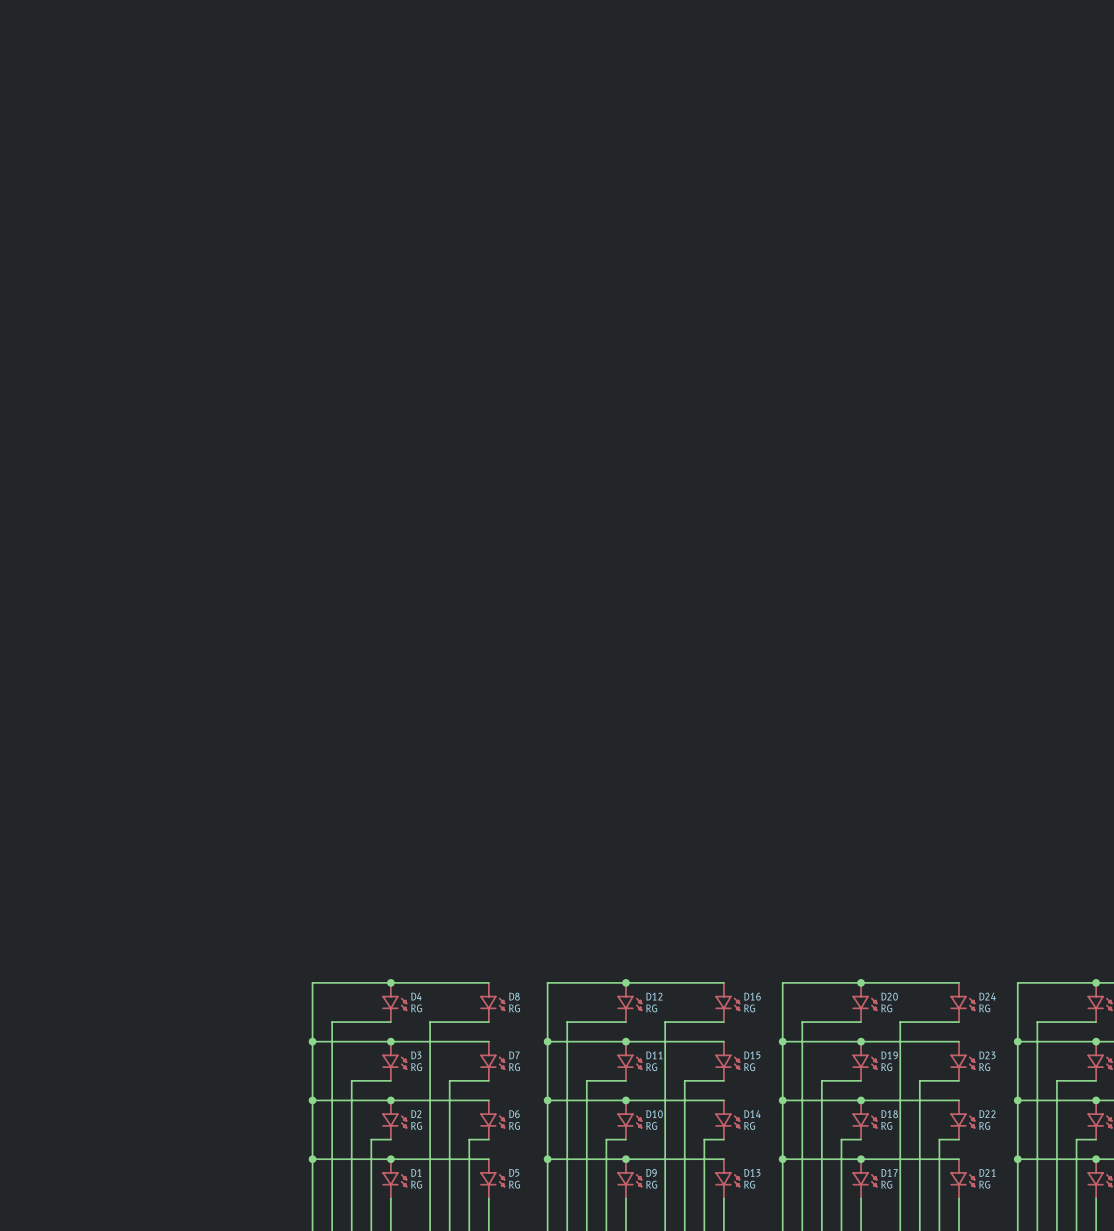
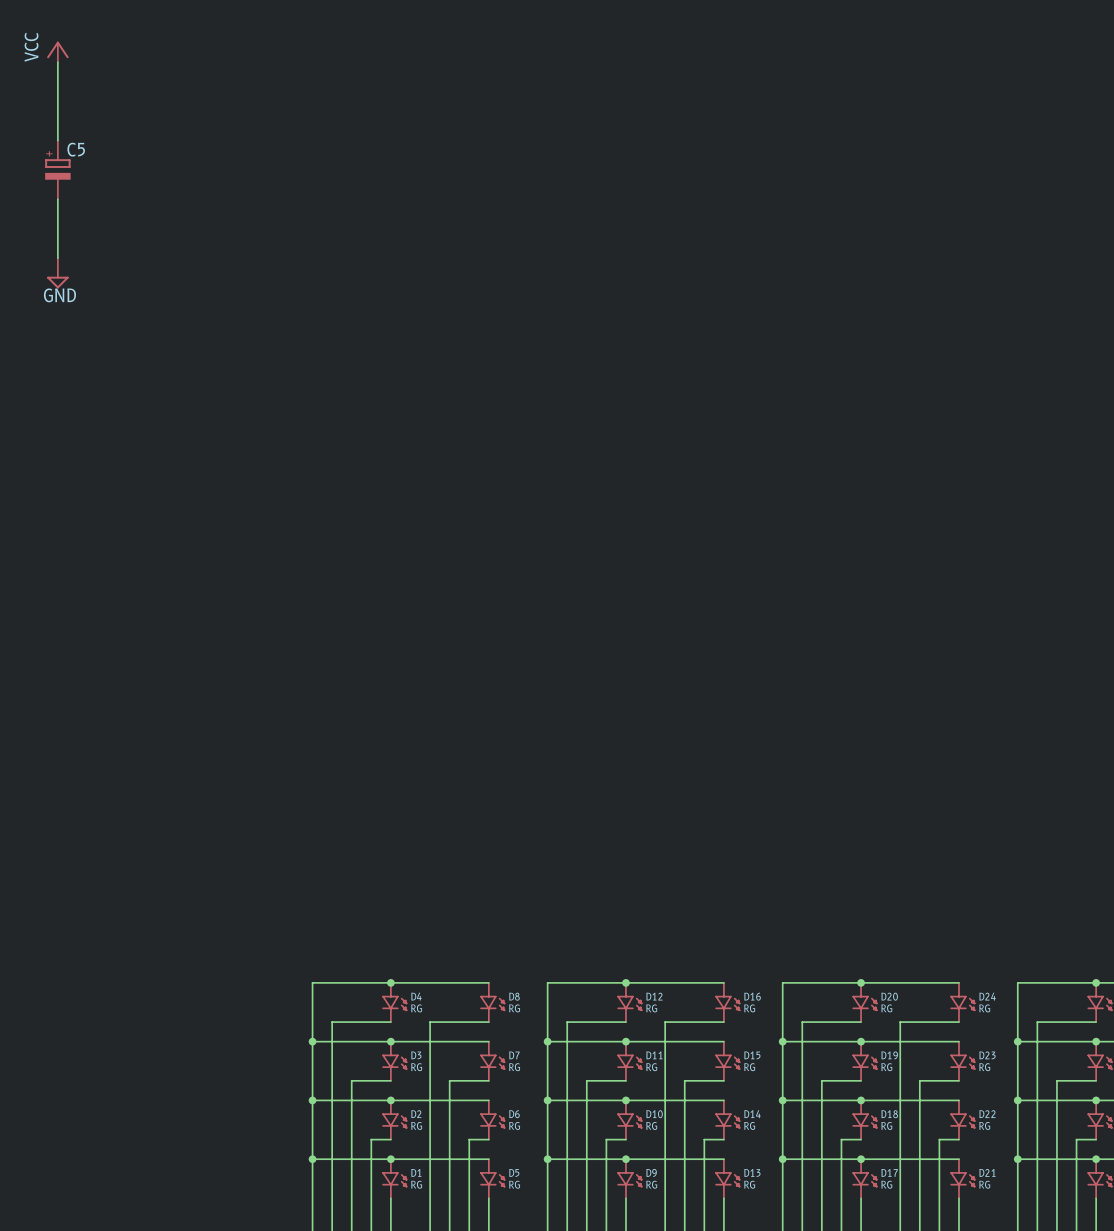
power symbol: none -> VCC (57, 51)
wire: none -> (57, 62) (57, 140)
C5: none -> (57, 169)
wire: none -> (57, 199) (57, 258)
power symbol: none -> GND (57, 273)

